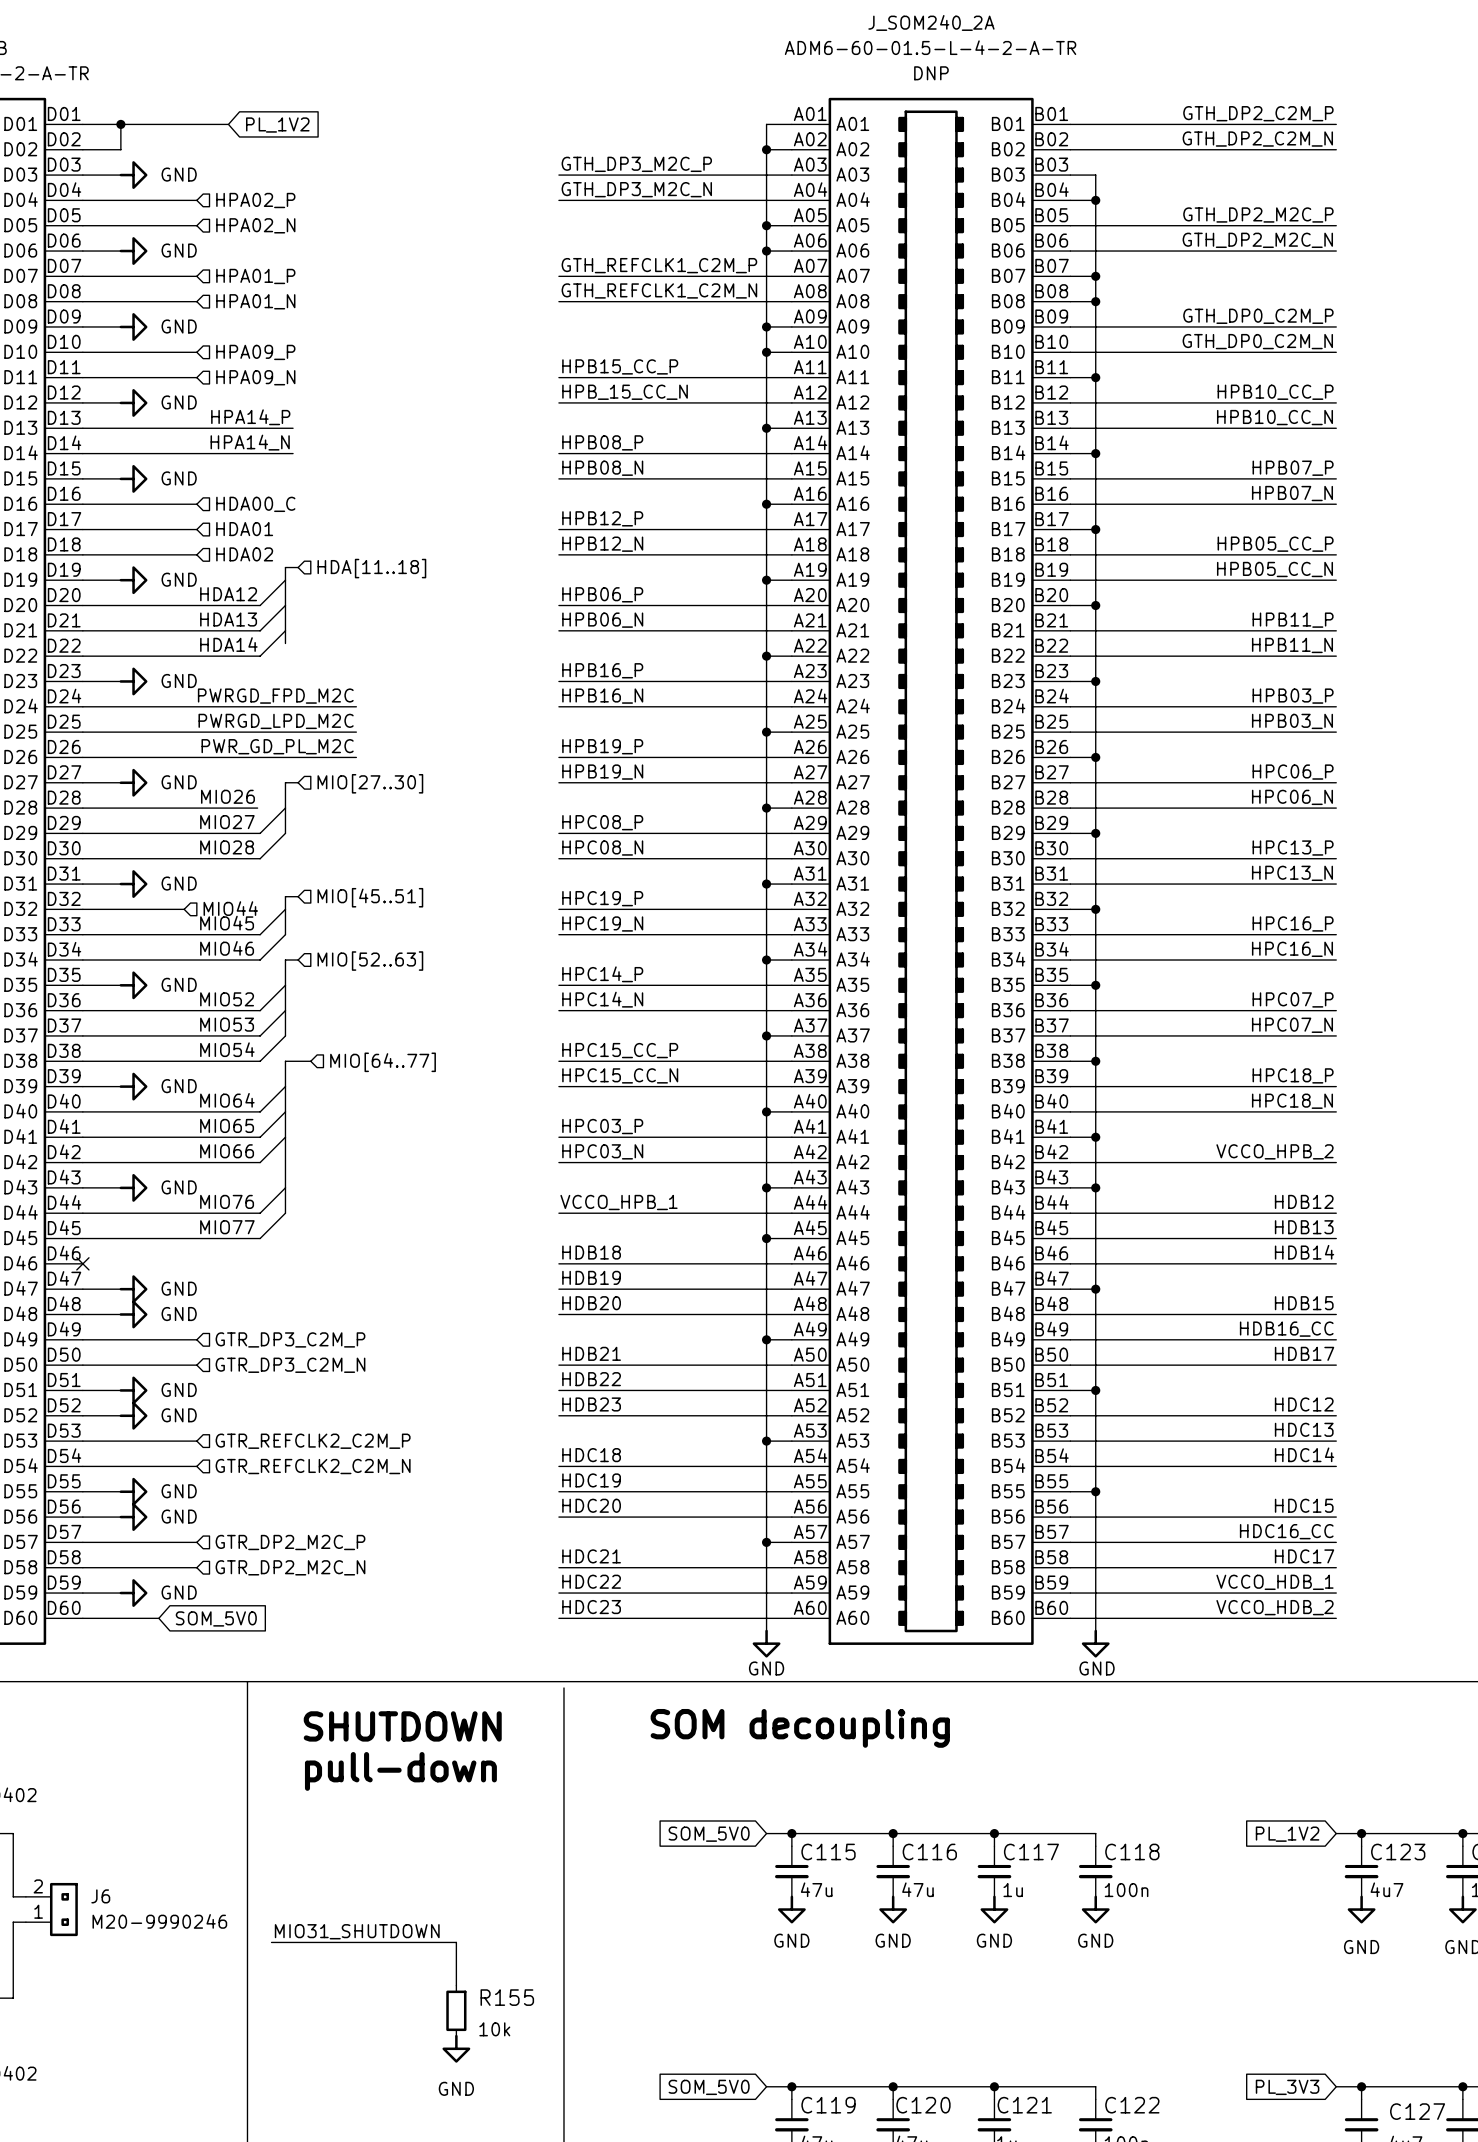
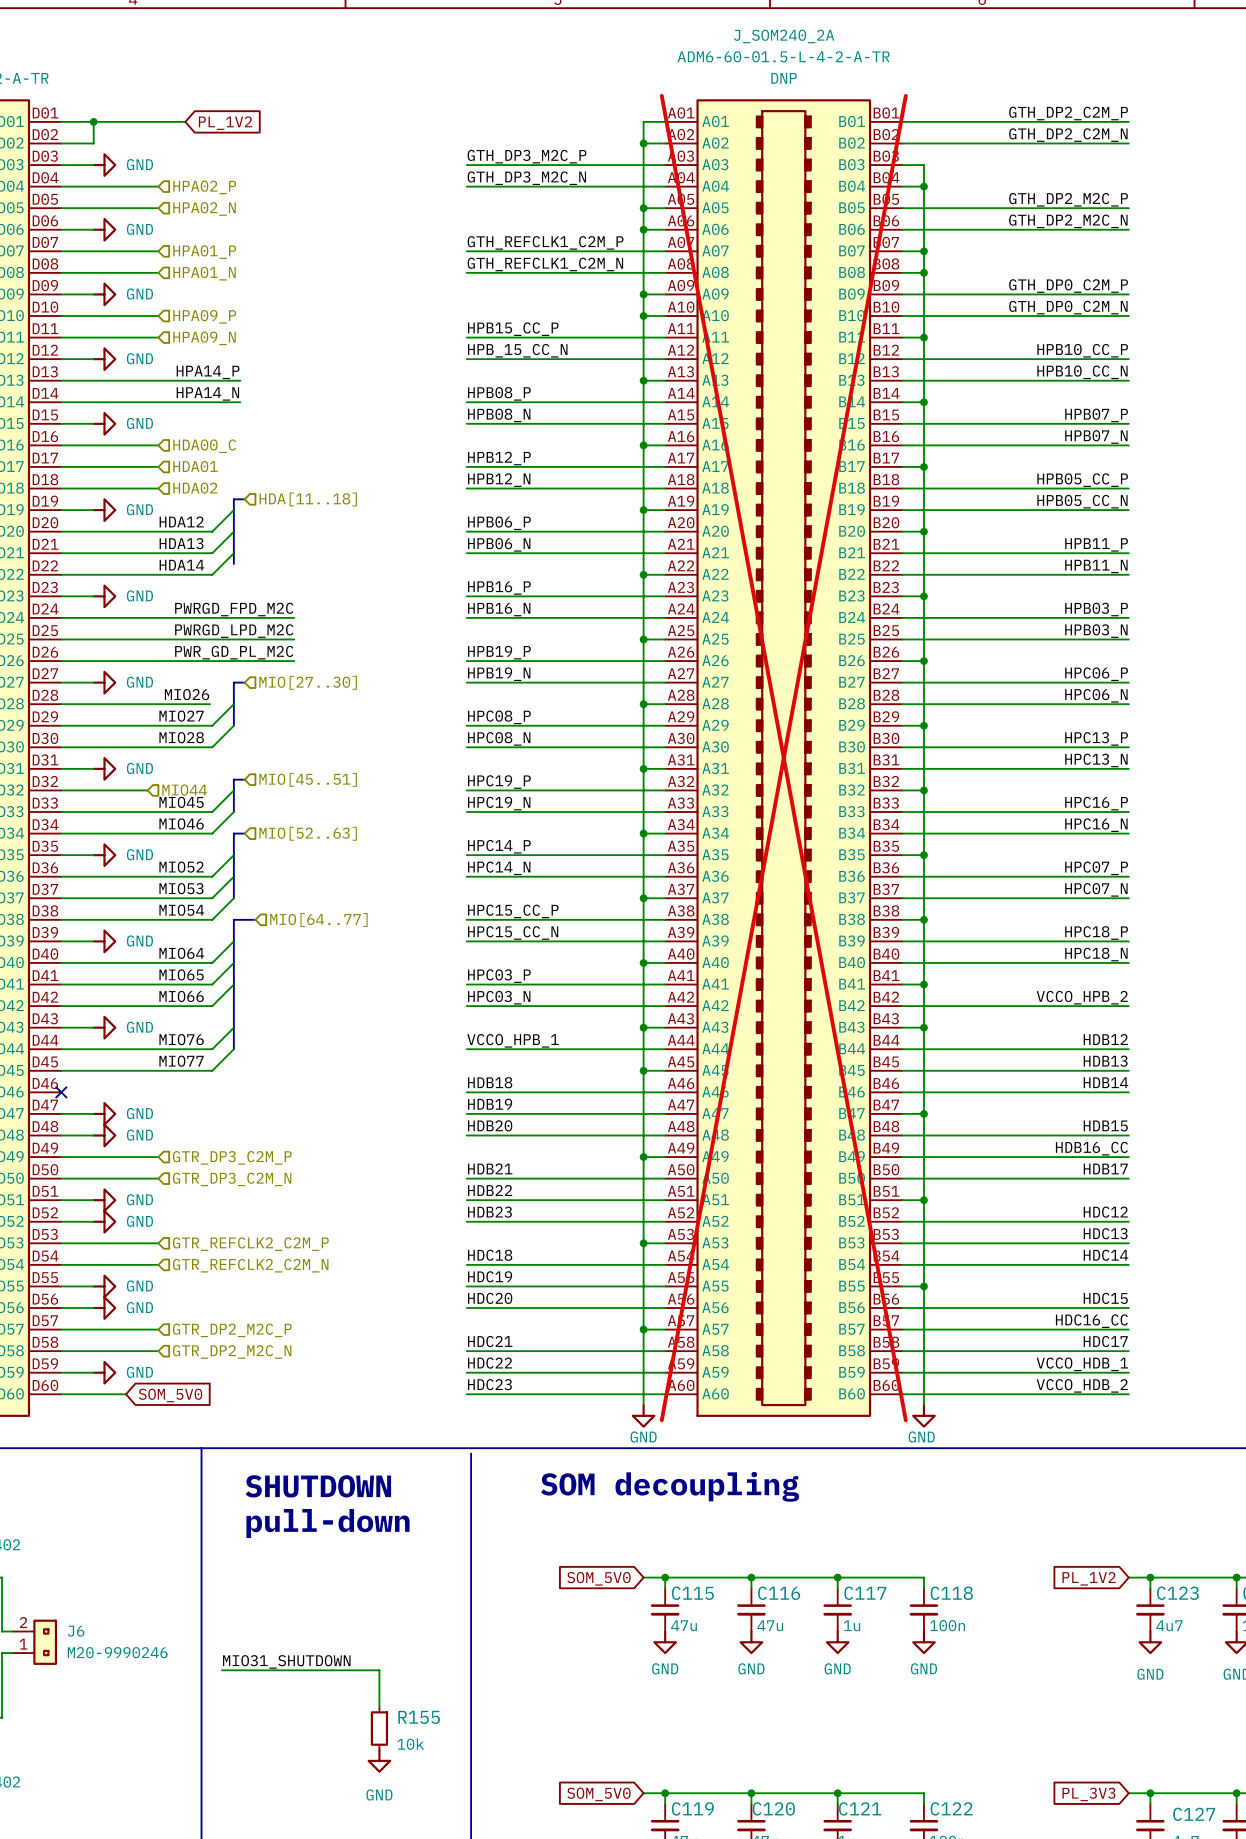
J_SOM240_2A do-not-place cross: none -> (783, 758)

